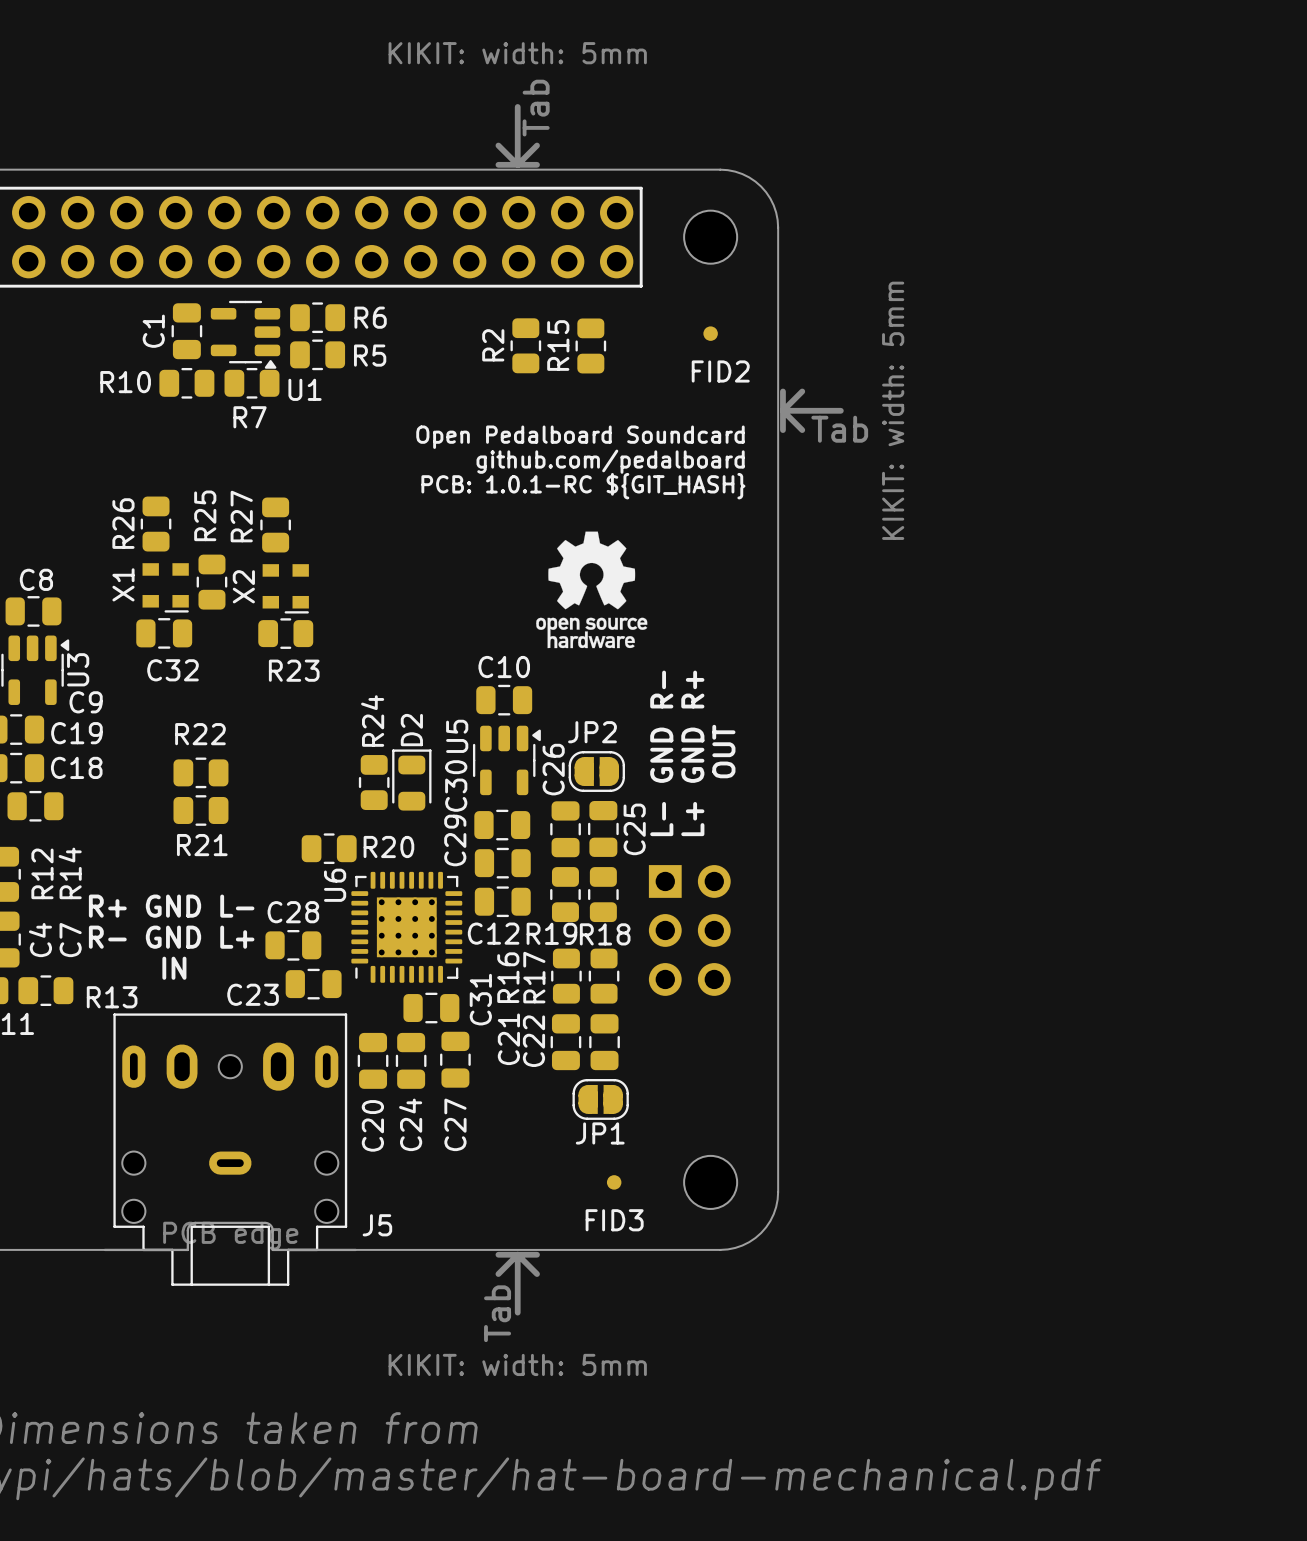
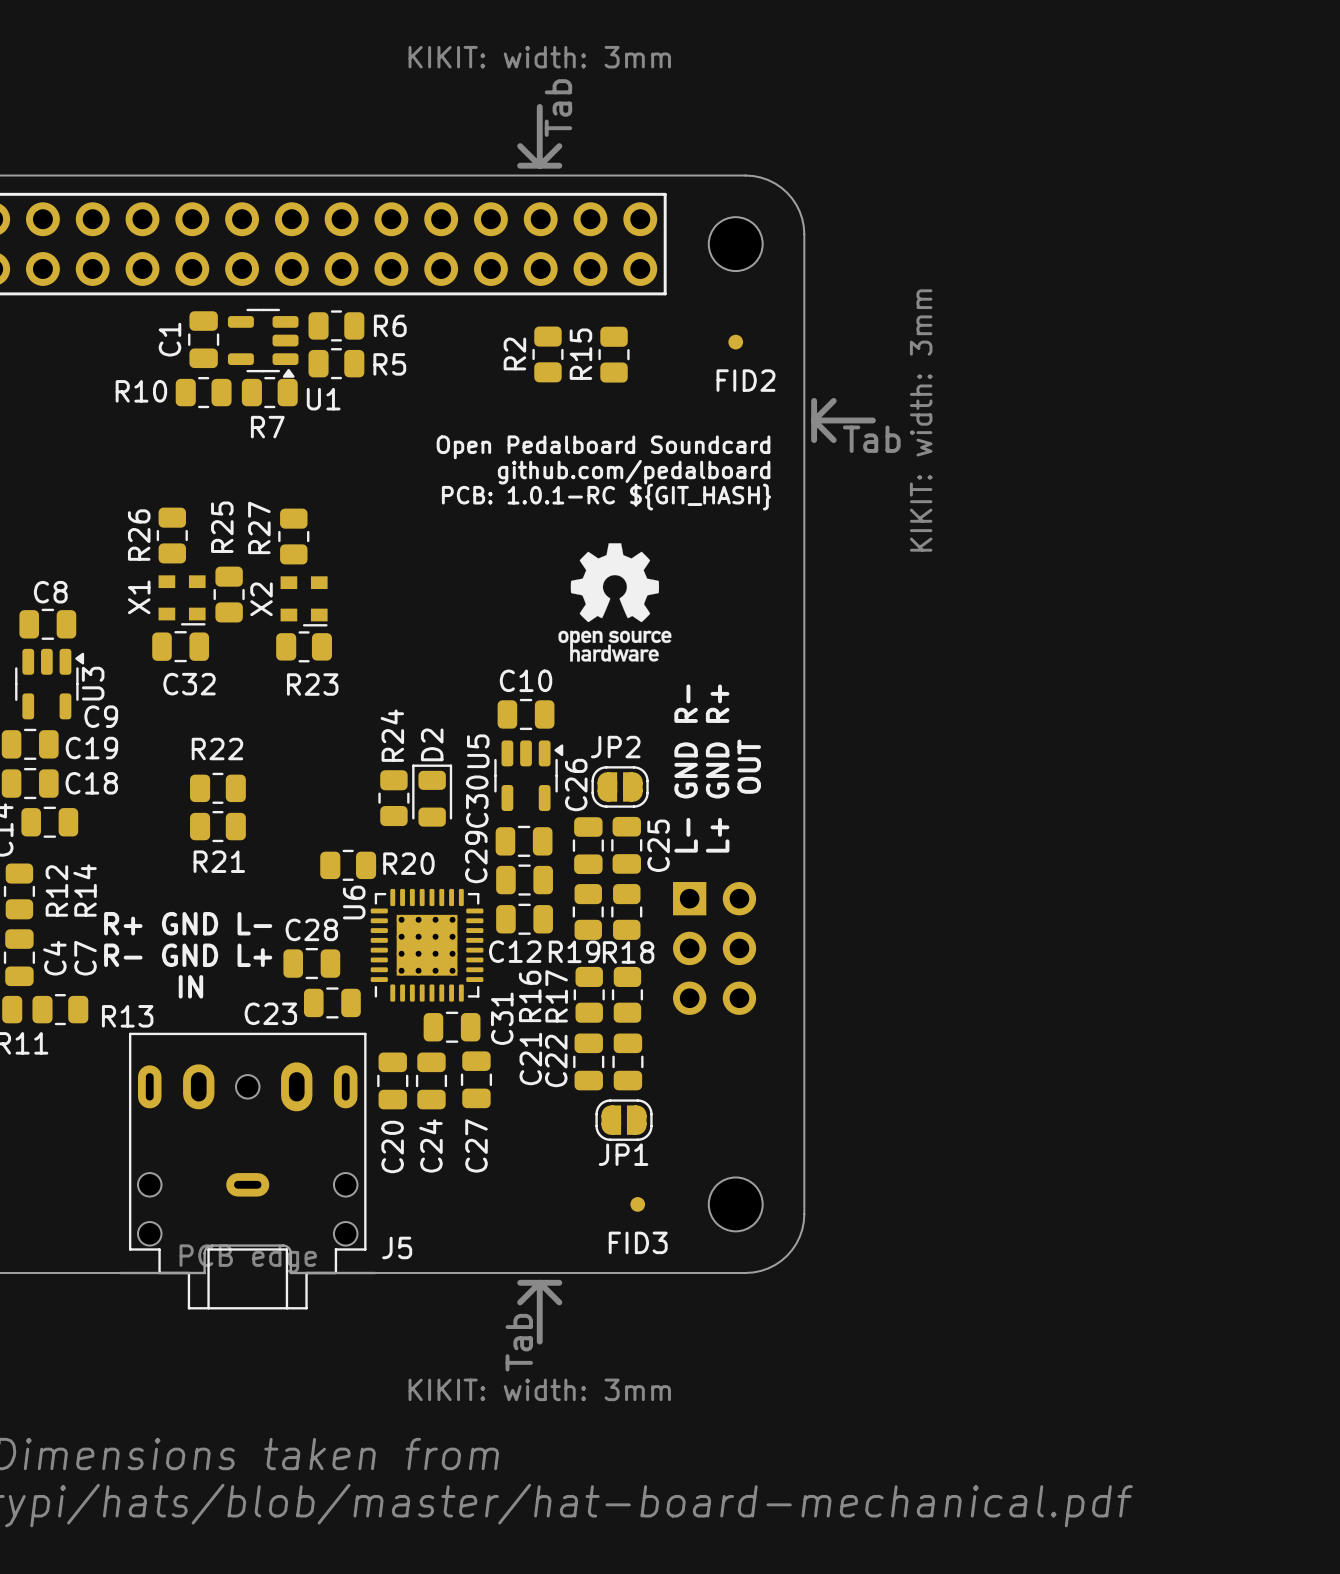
drawing shape: [388, 42, 647, 168] -> [408, 45, 671, 169]
drawing shape: [780, 281, 905, 540] -> [811, 289, 933, 552]
drawing shape: [388, 1251, 647, 1377] -> [408, 1279, 671, 1402]

